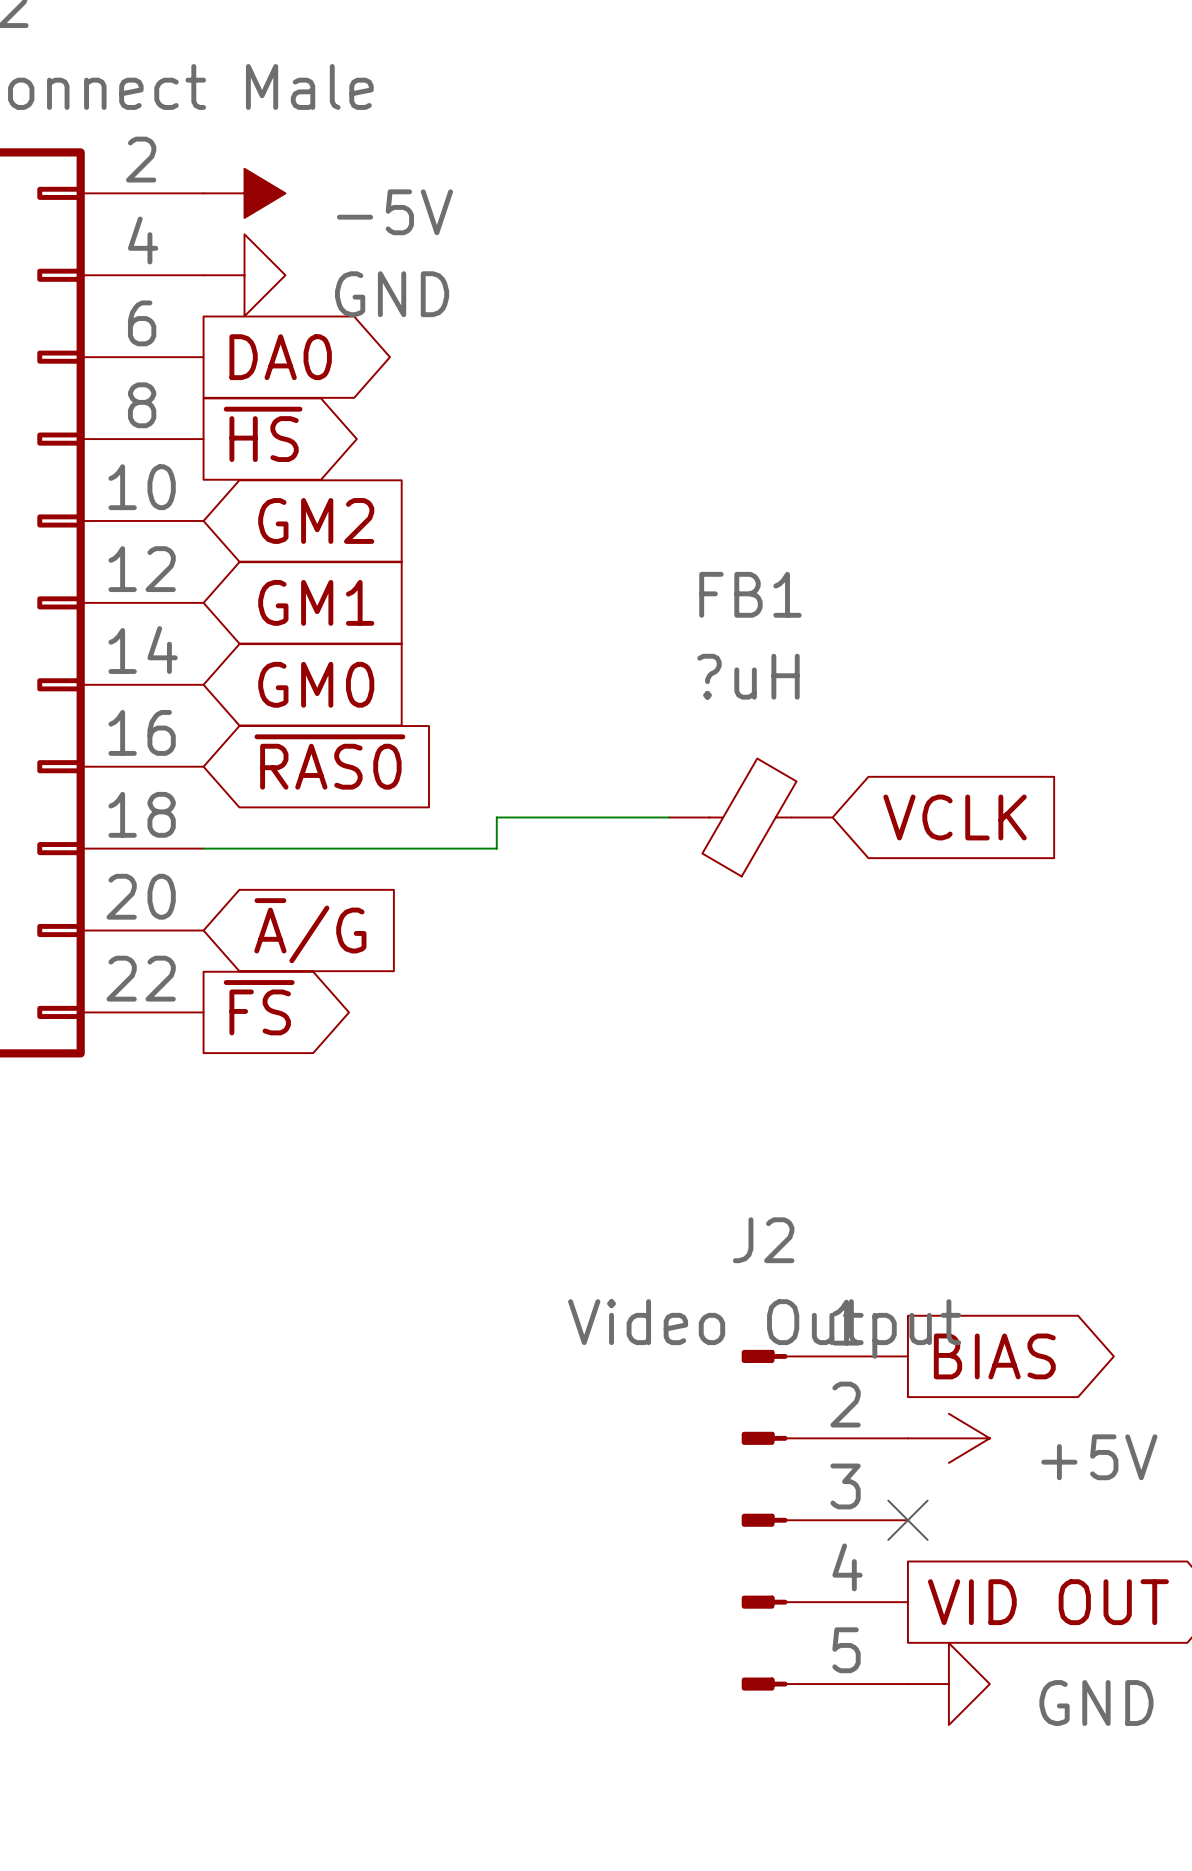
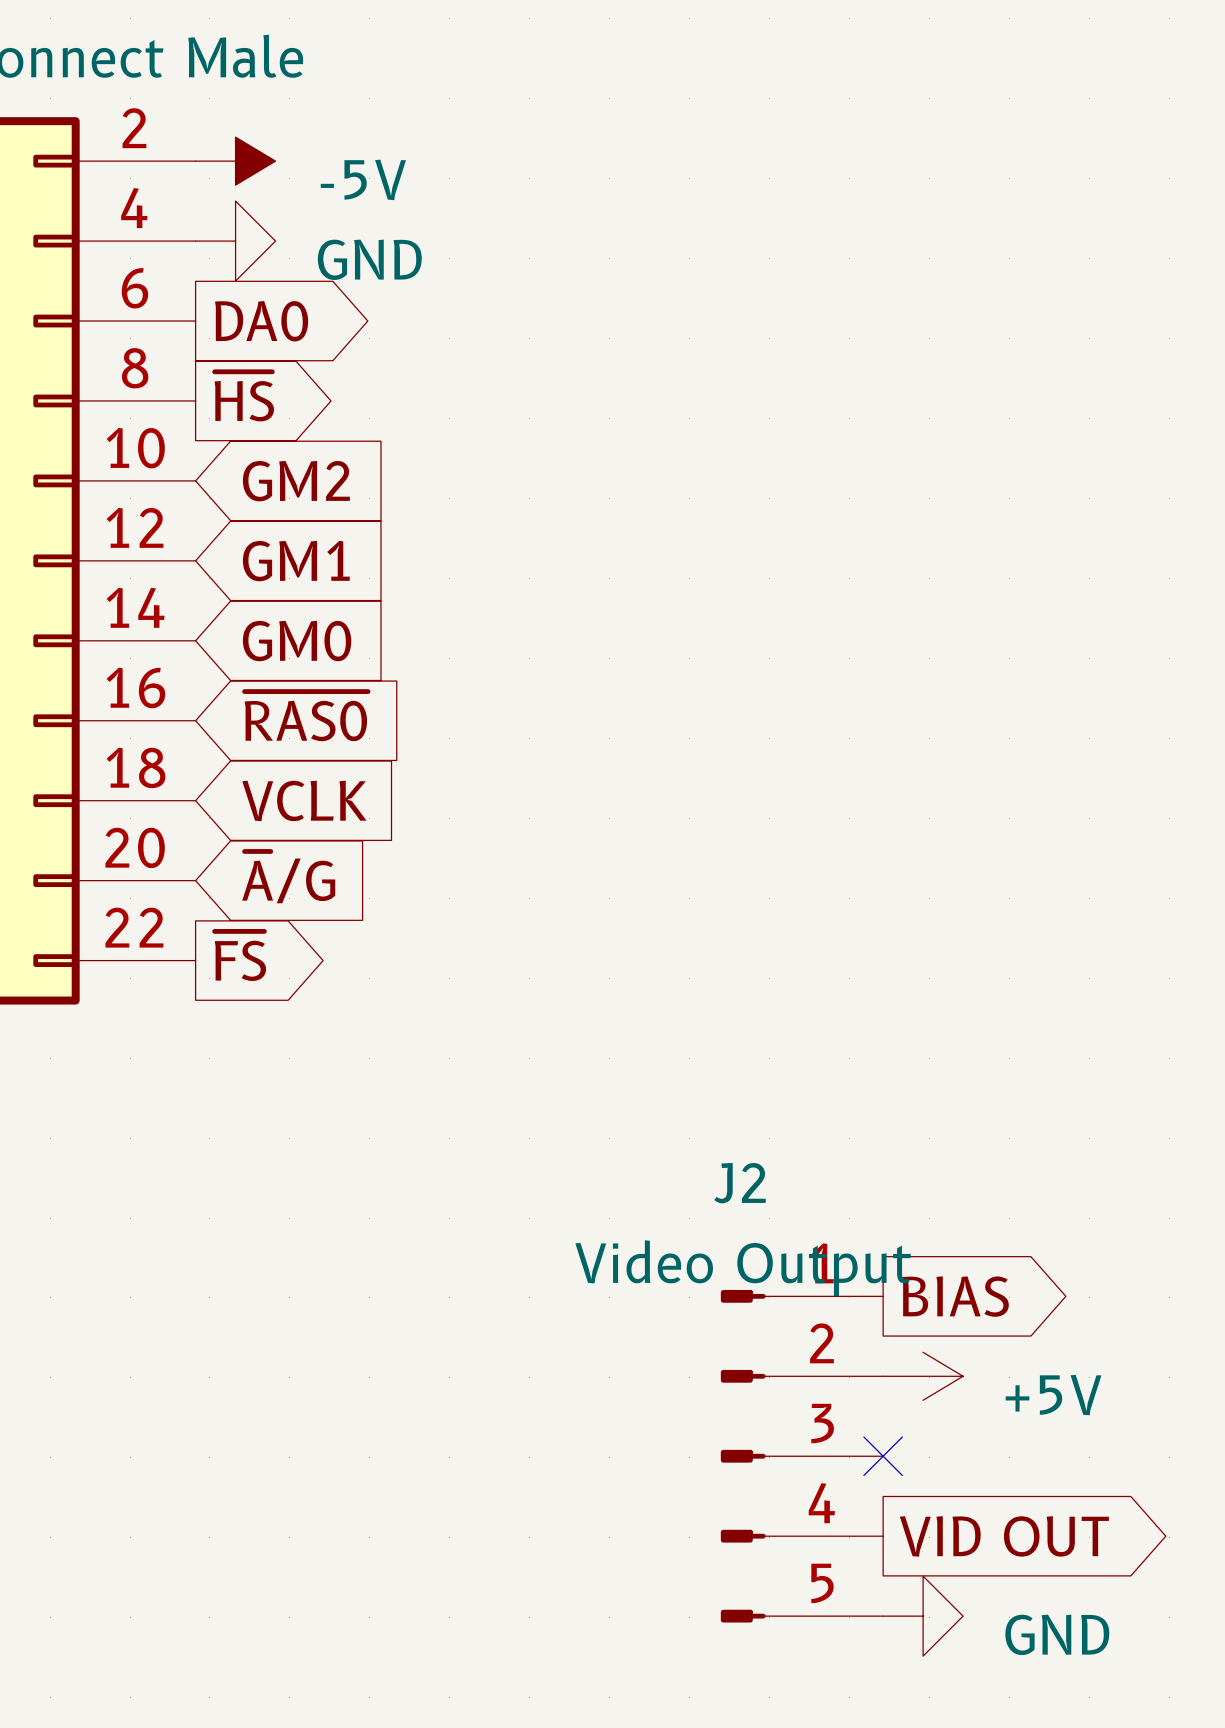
wire: (668, 817) (496, 817) (496, 848) (203, 848) -> none
FB1: ?uH (750, 817) -> none
global label position: VCLK (955, 817) -> VCLK (304, 800)

